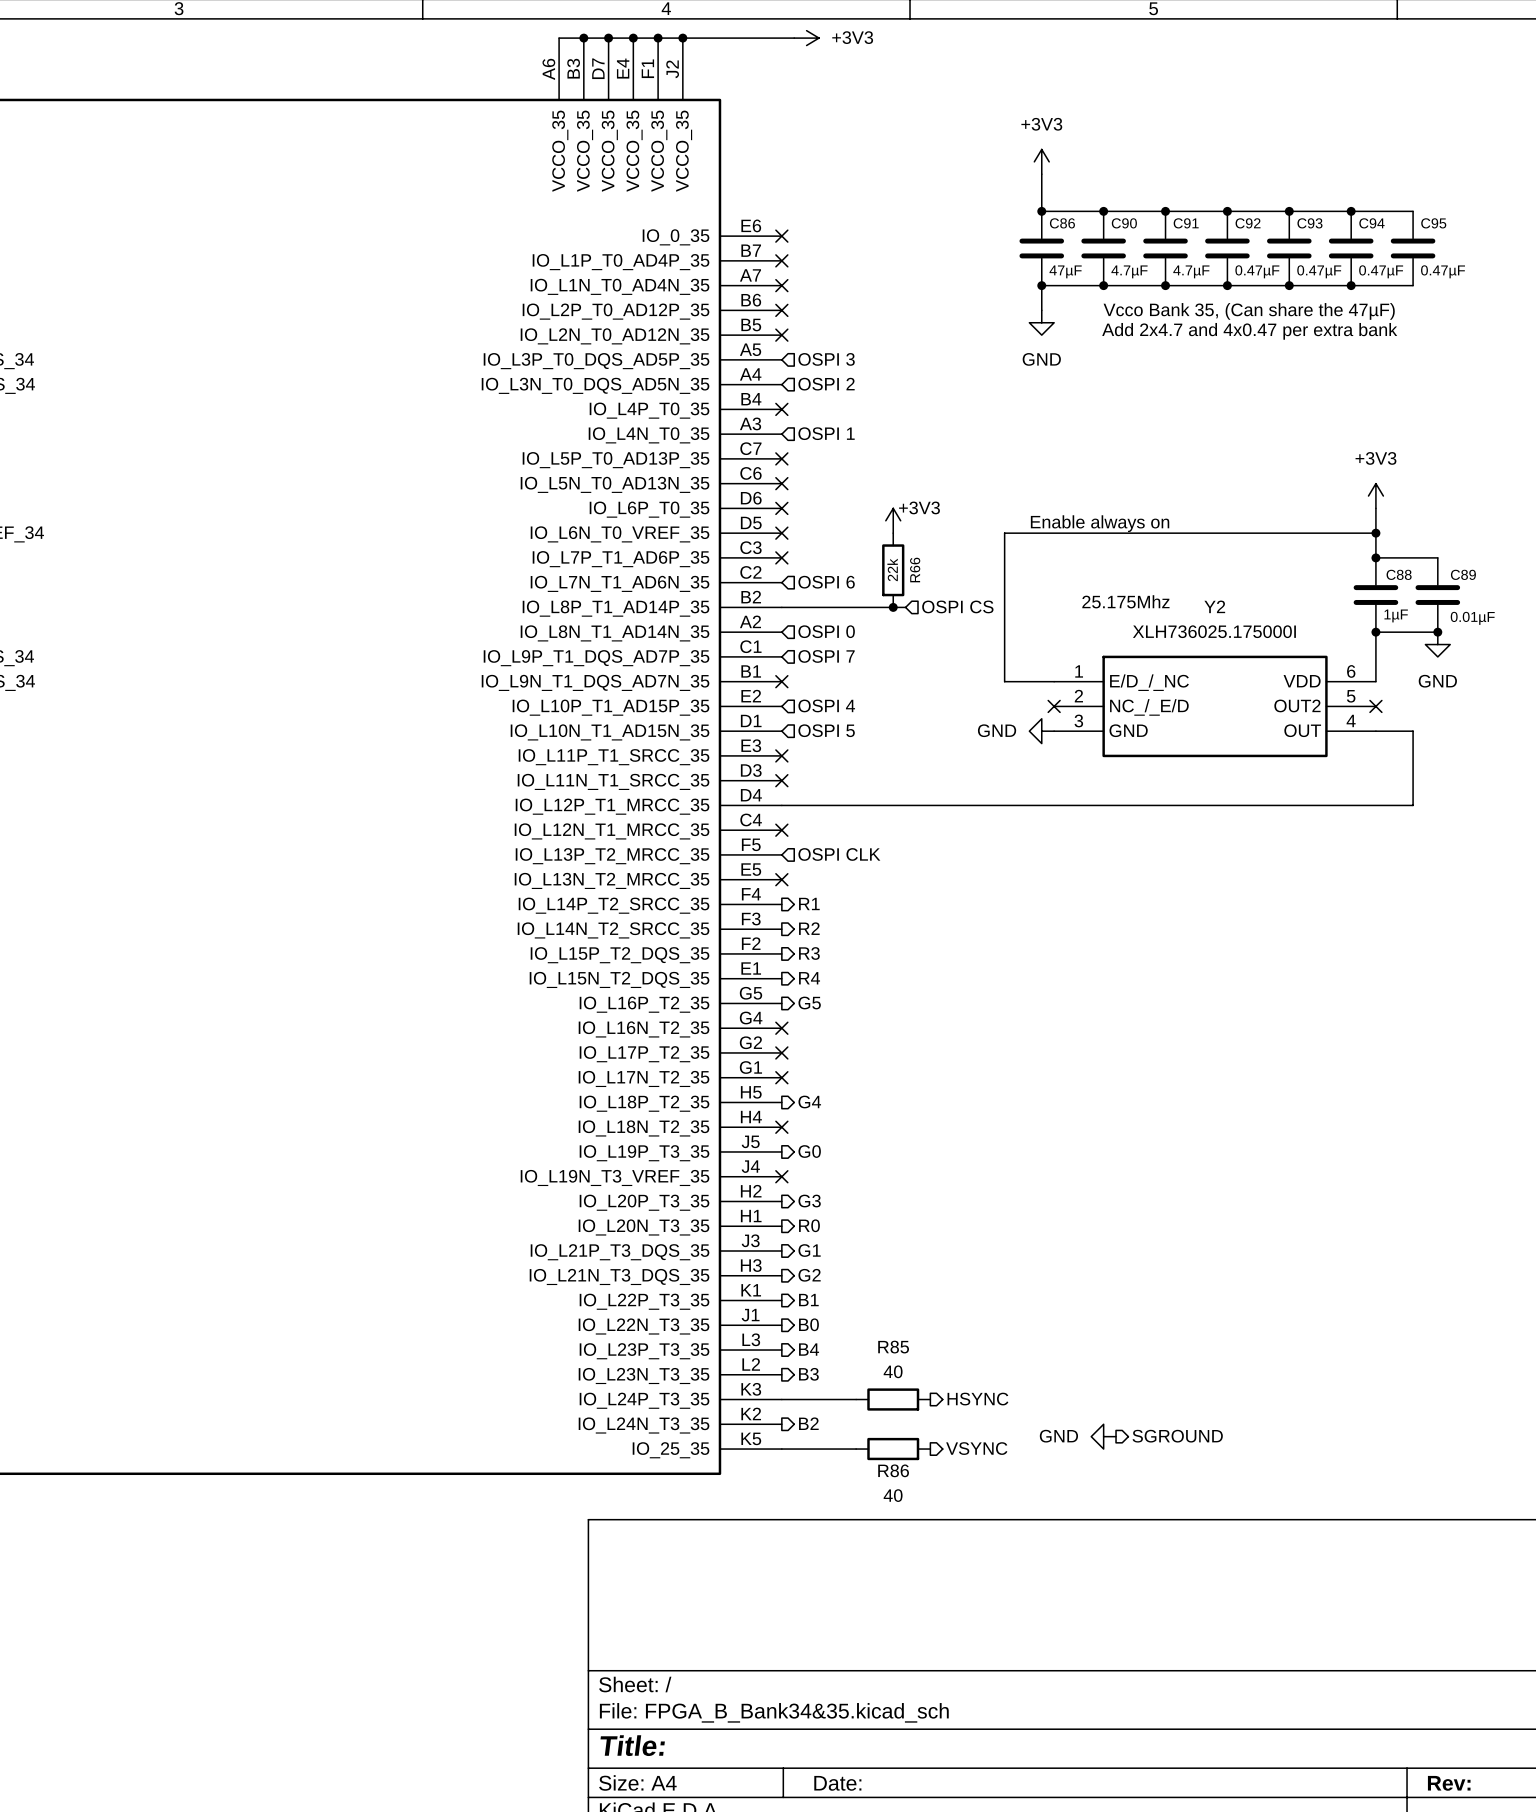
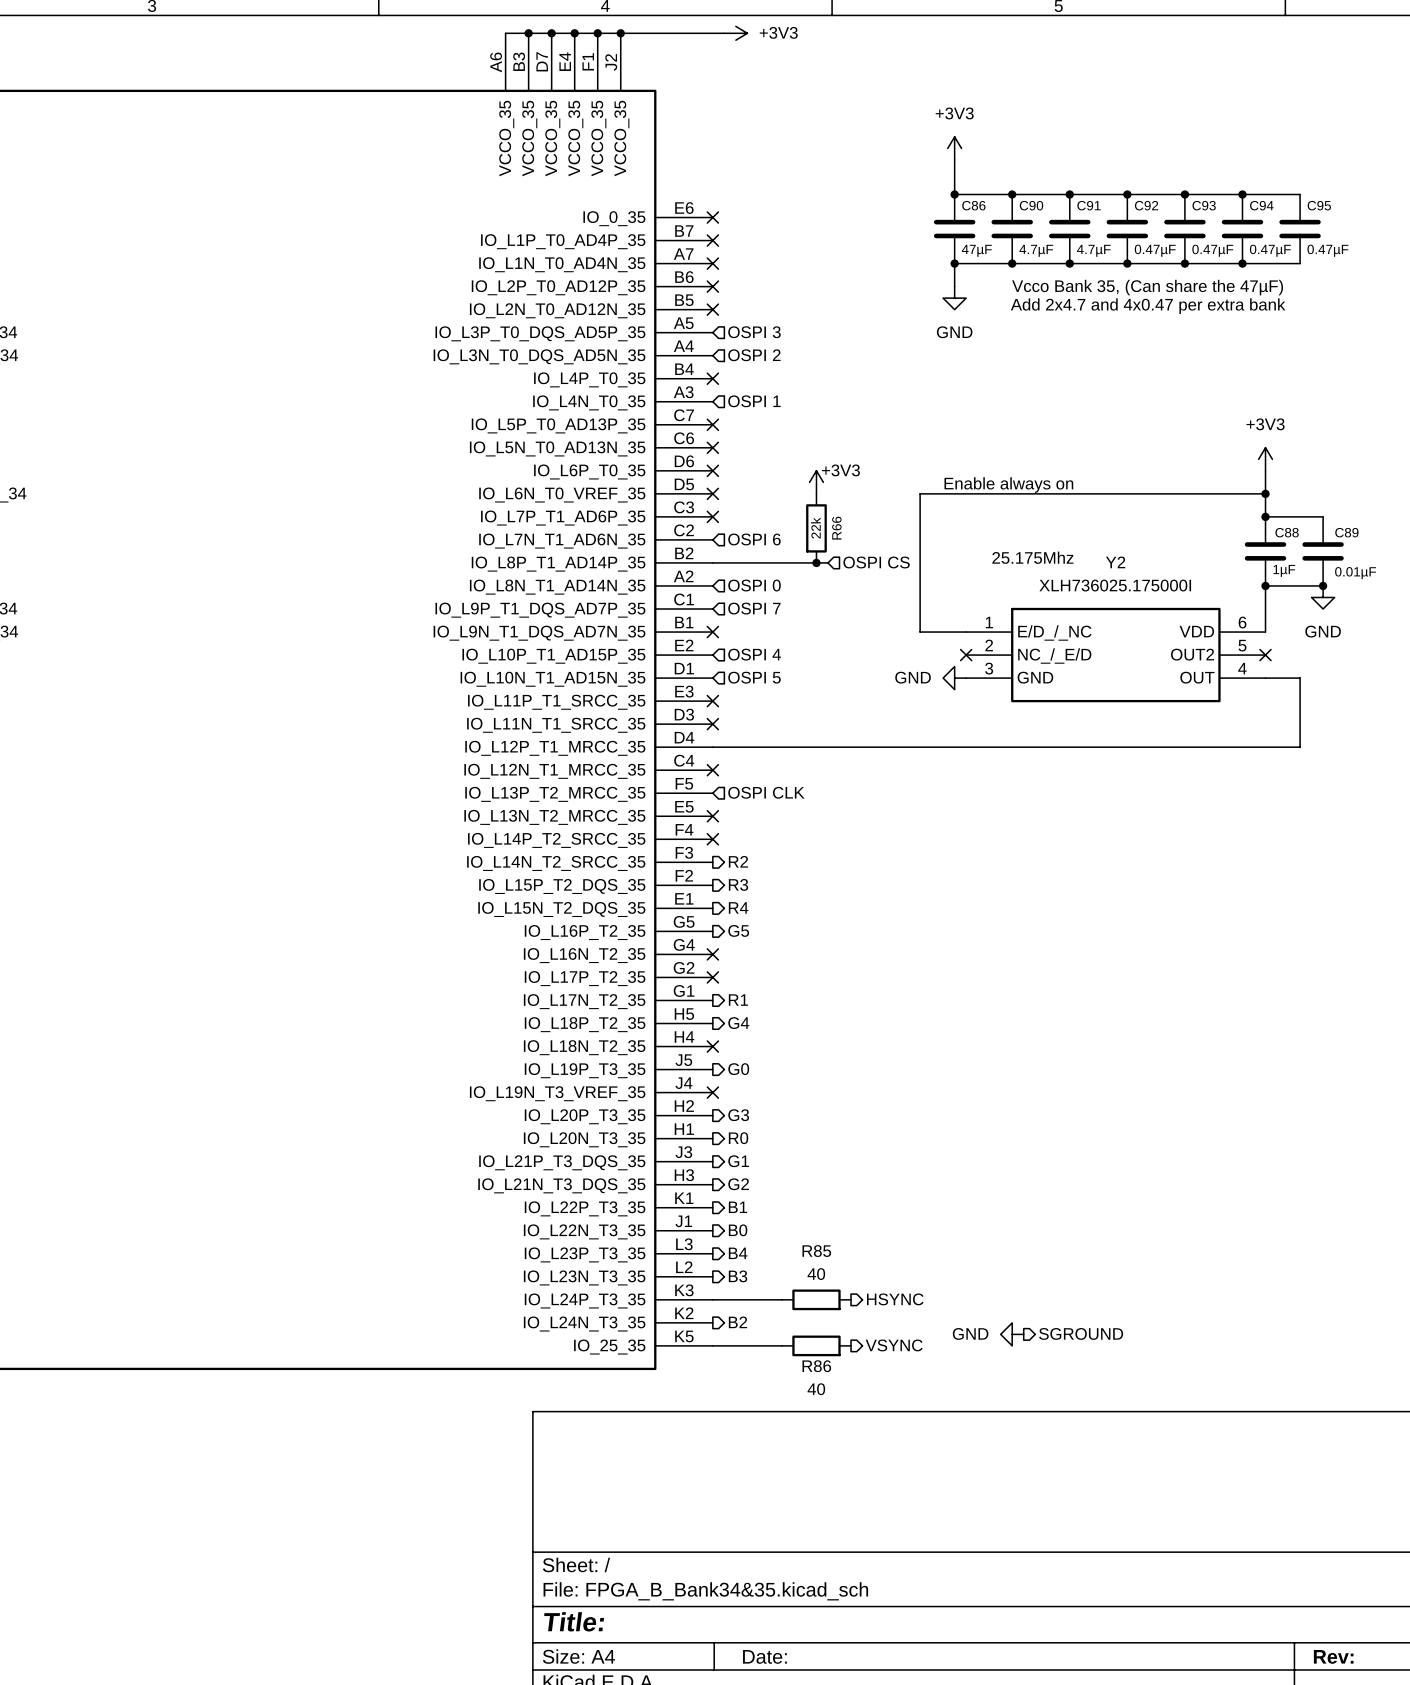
hierarchical label position: R1 (809, 903) -> R1 (738, 1000)
no-connect mark: none -> (712, 839)
no-connect mark: (781, 1077) -> none

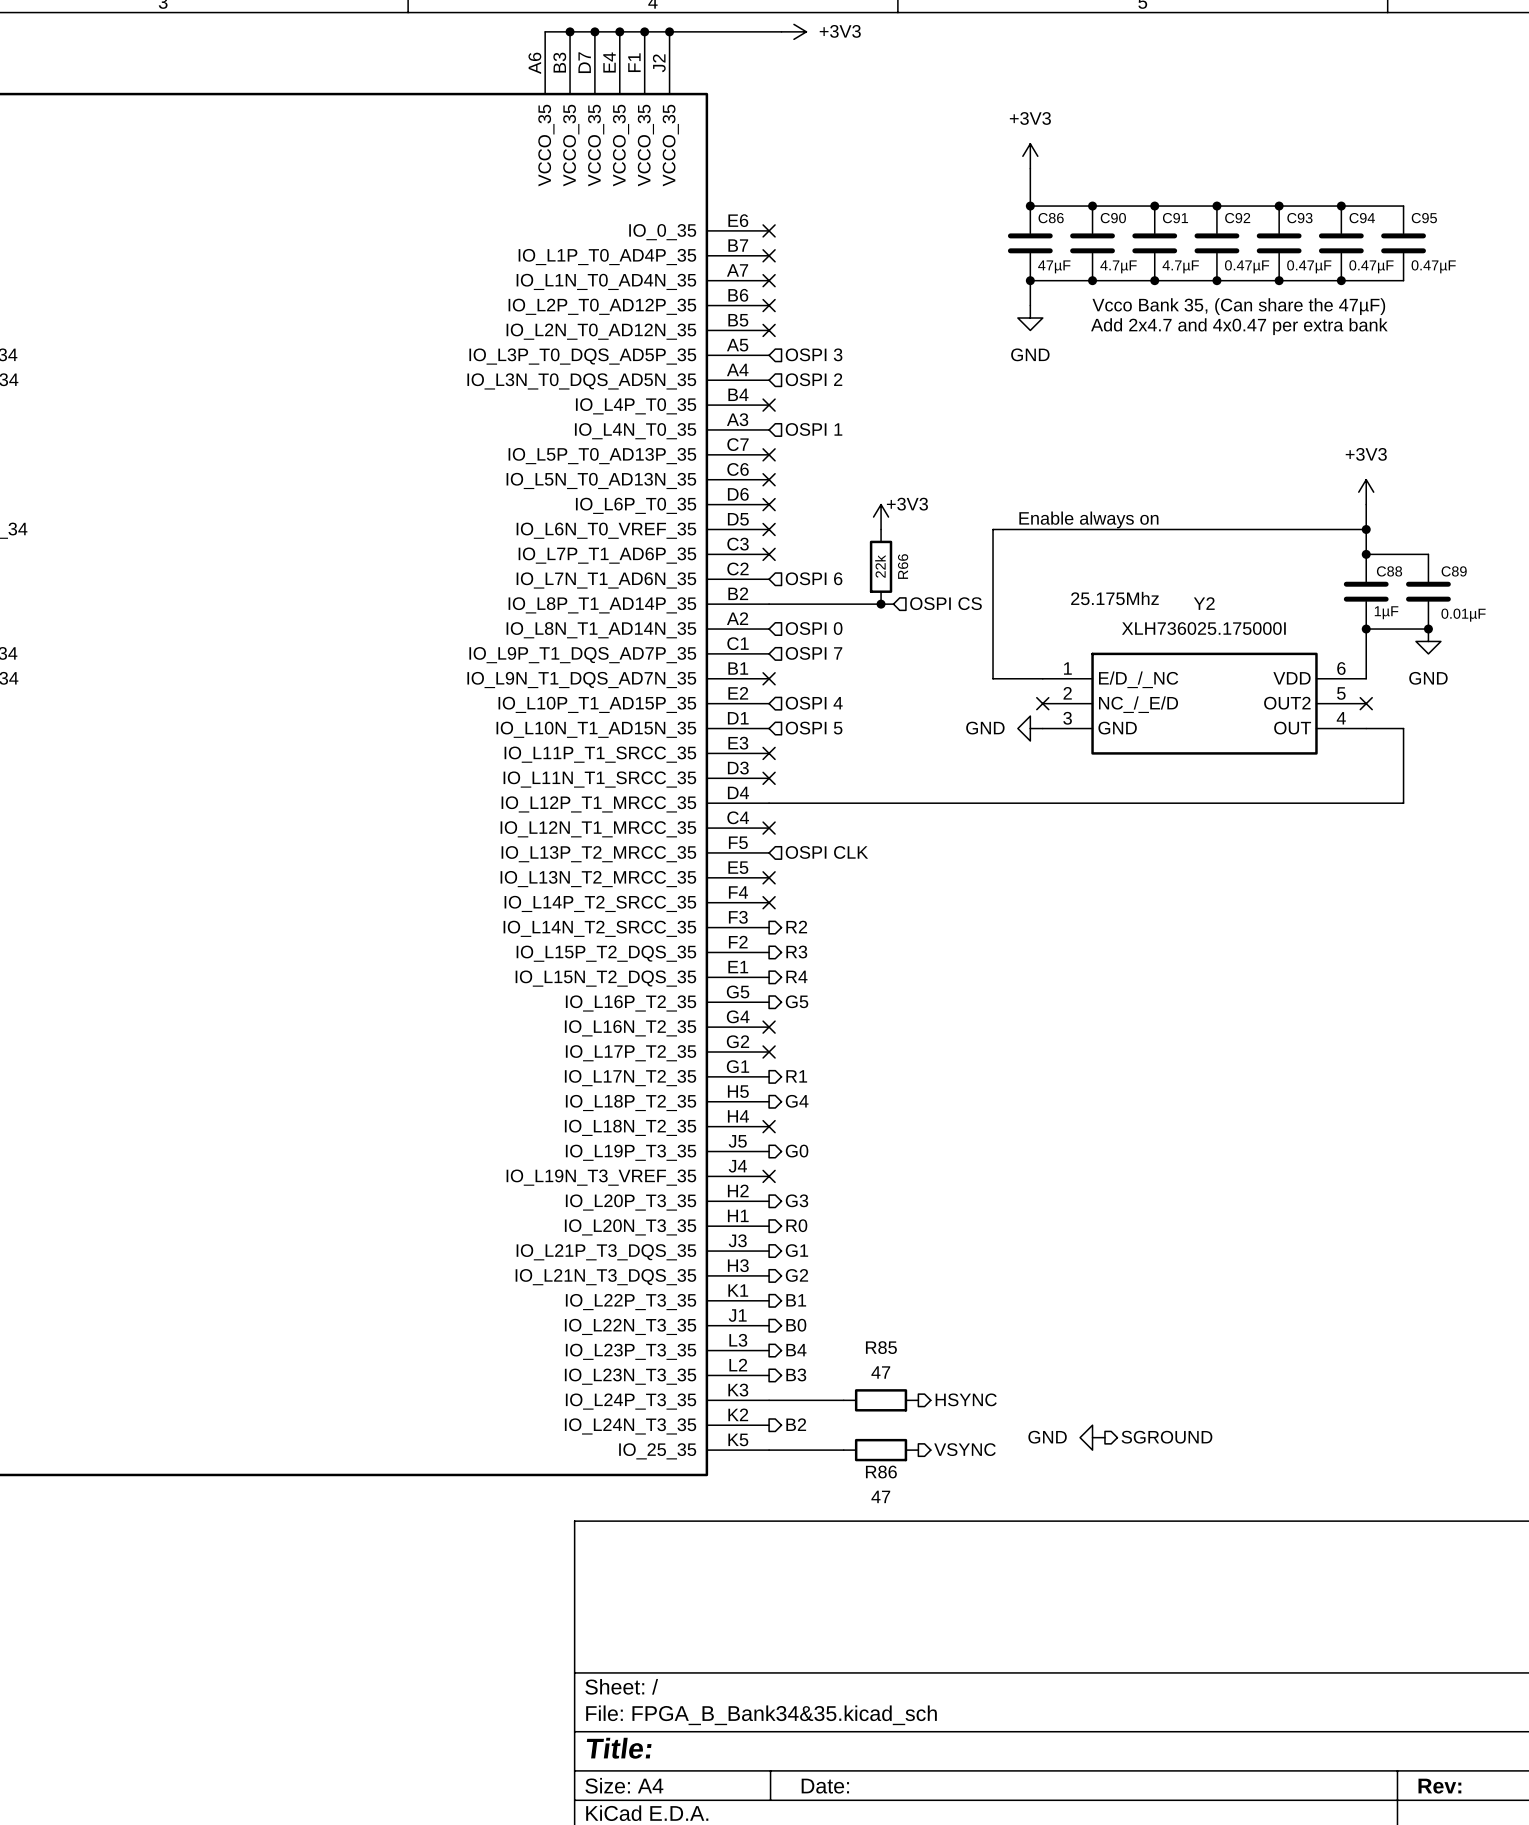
R85 value: 40 (816, 1274) -> 47 (880, 1372)
R86 value: 40 (816, 1389) -> 47 (880, 1496)

